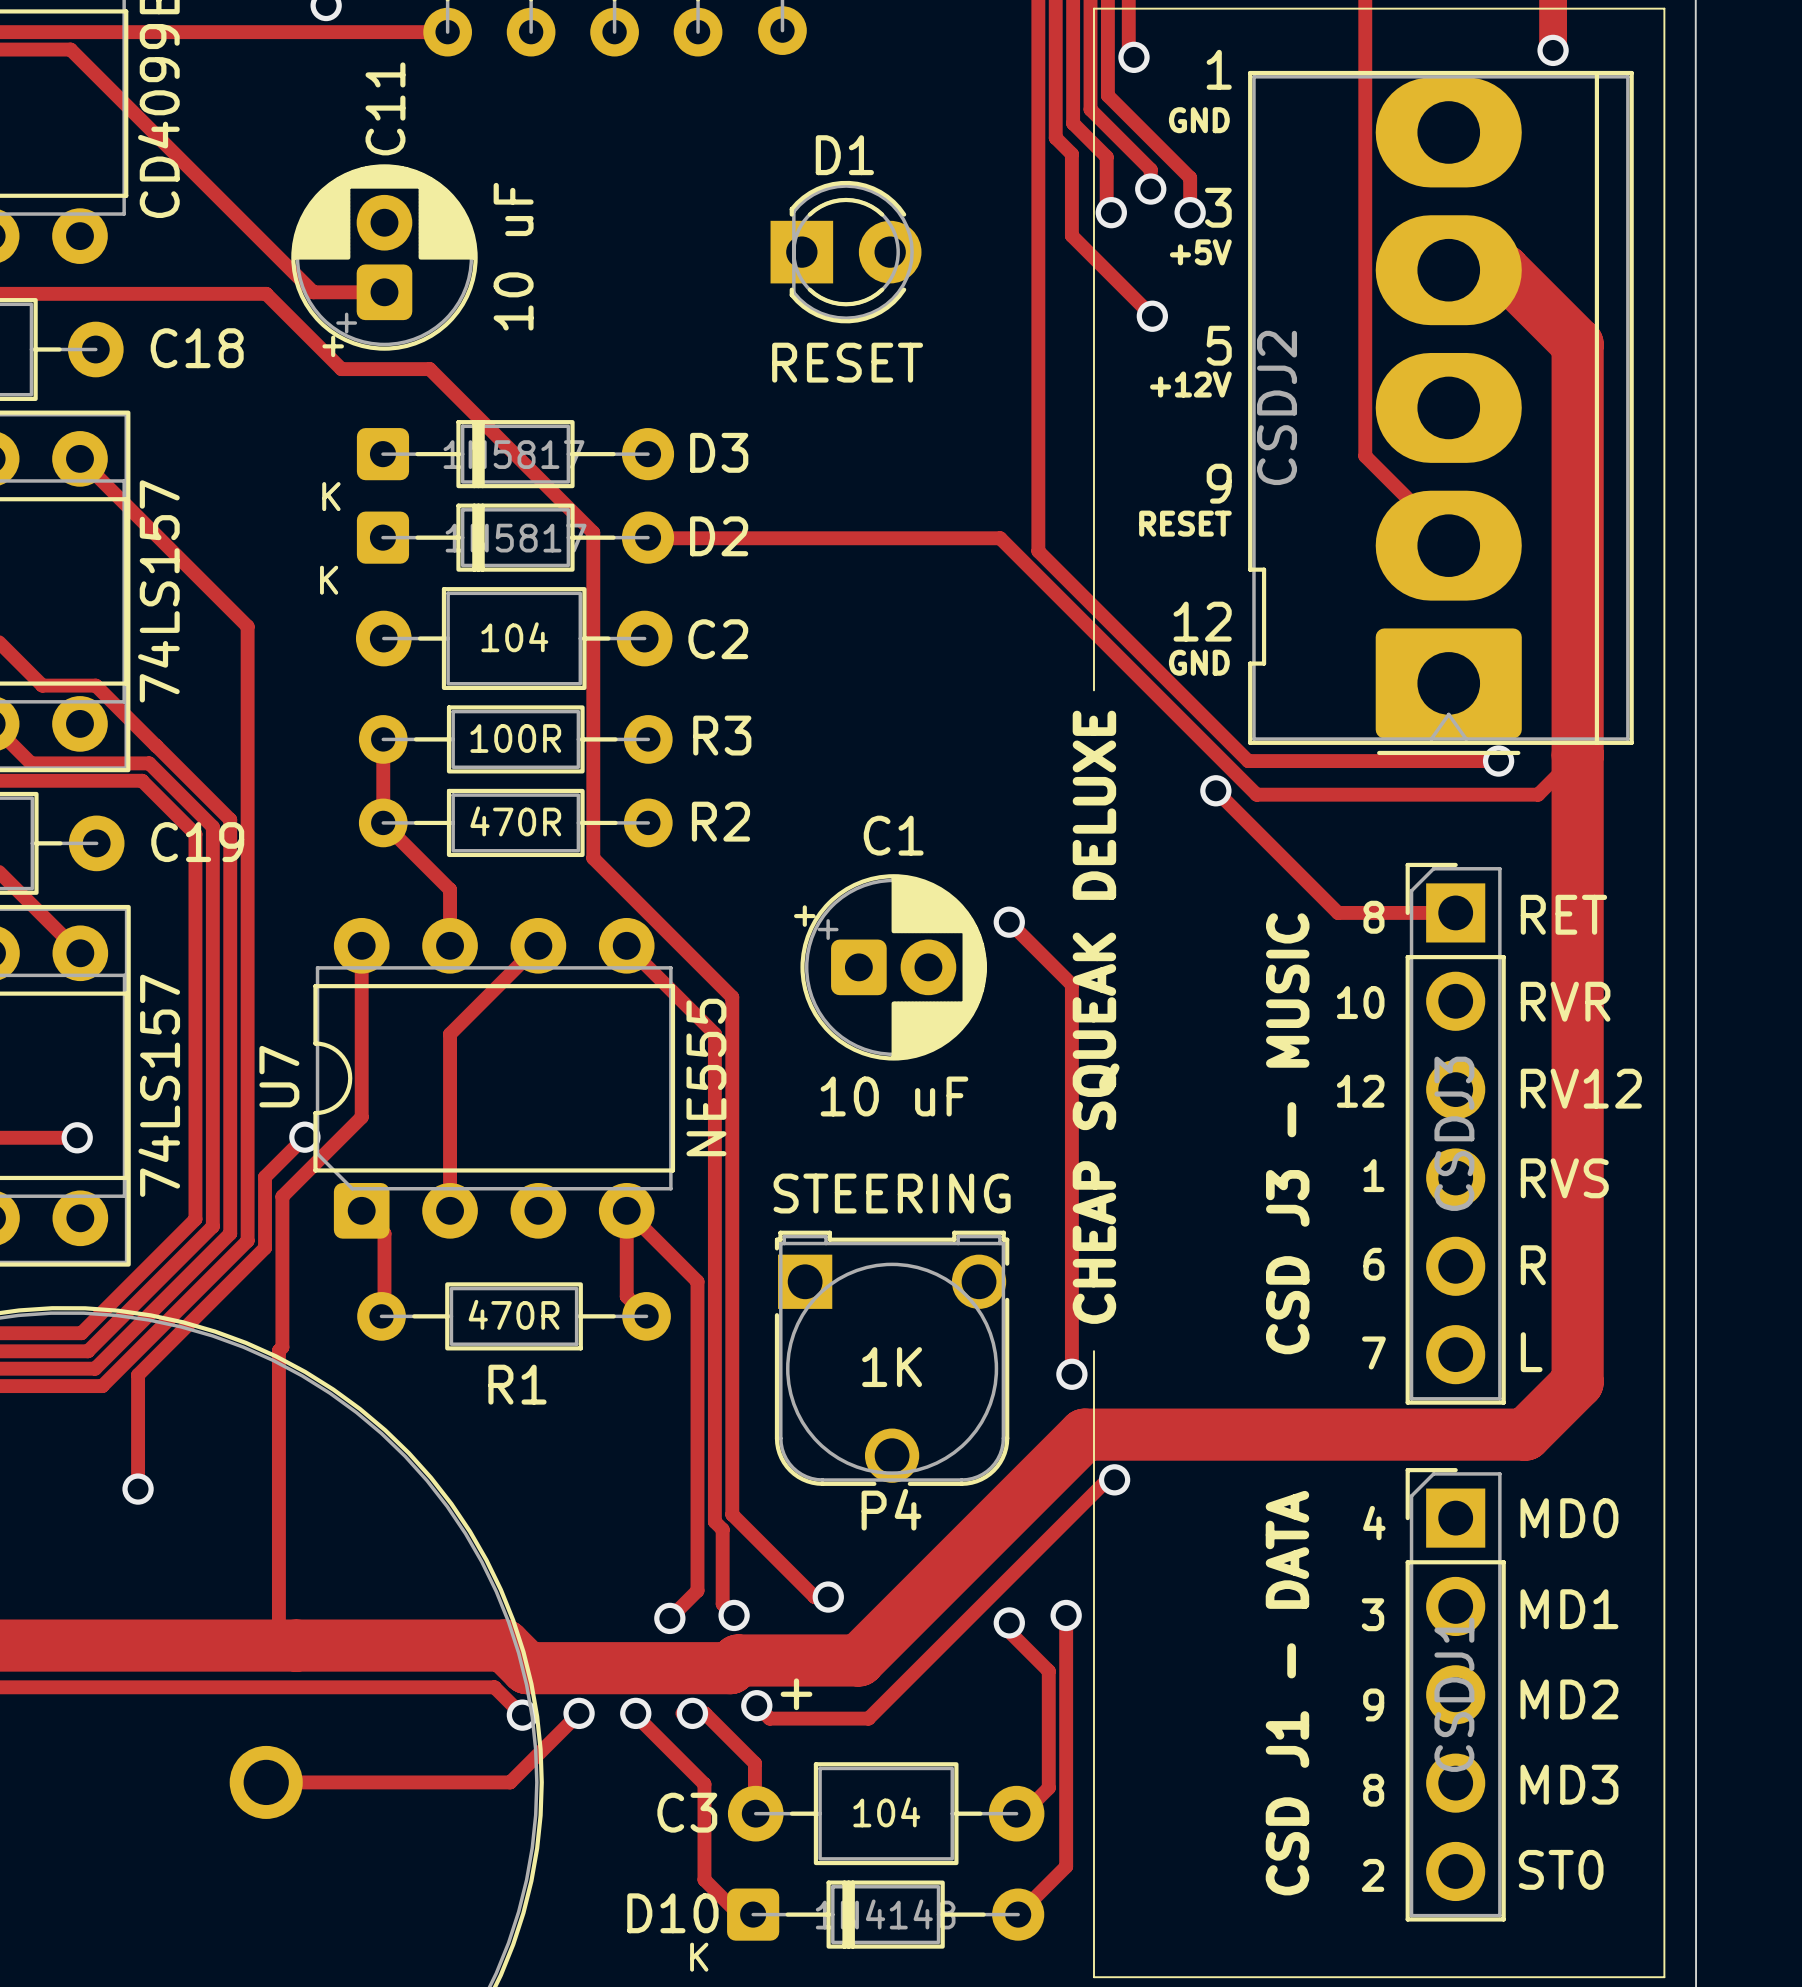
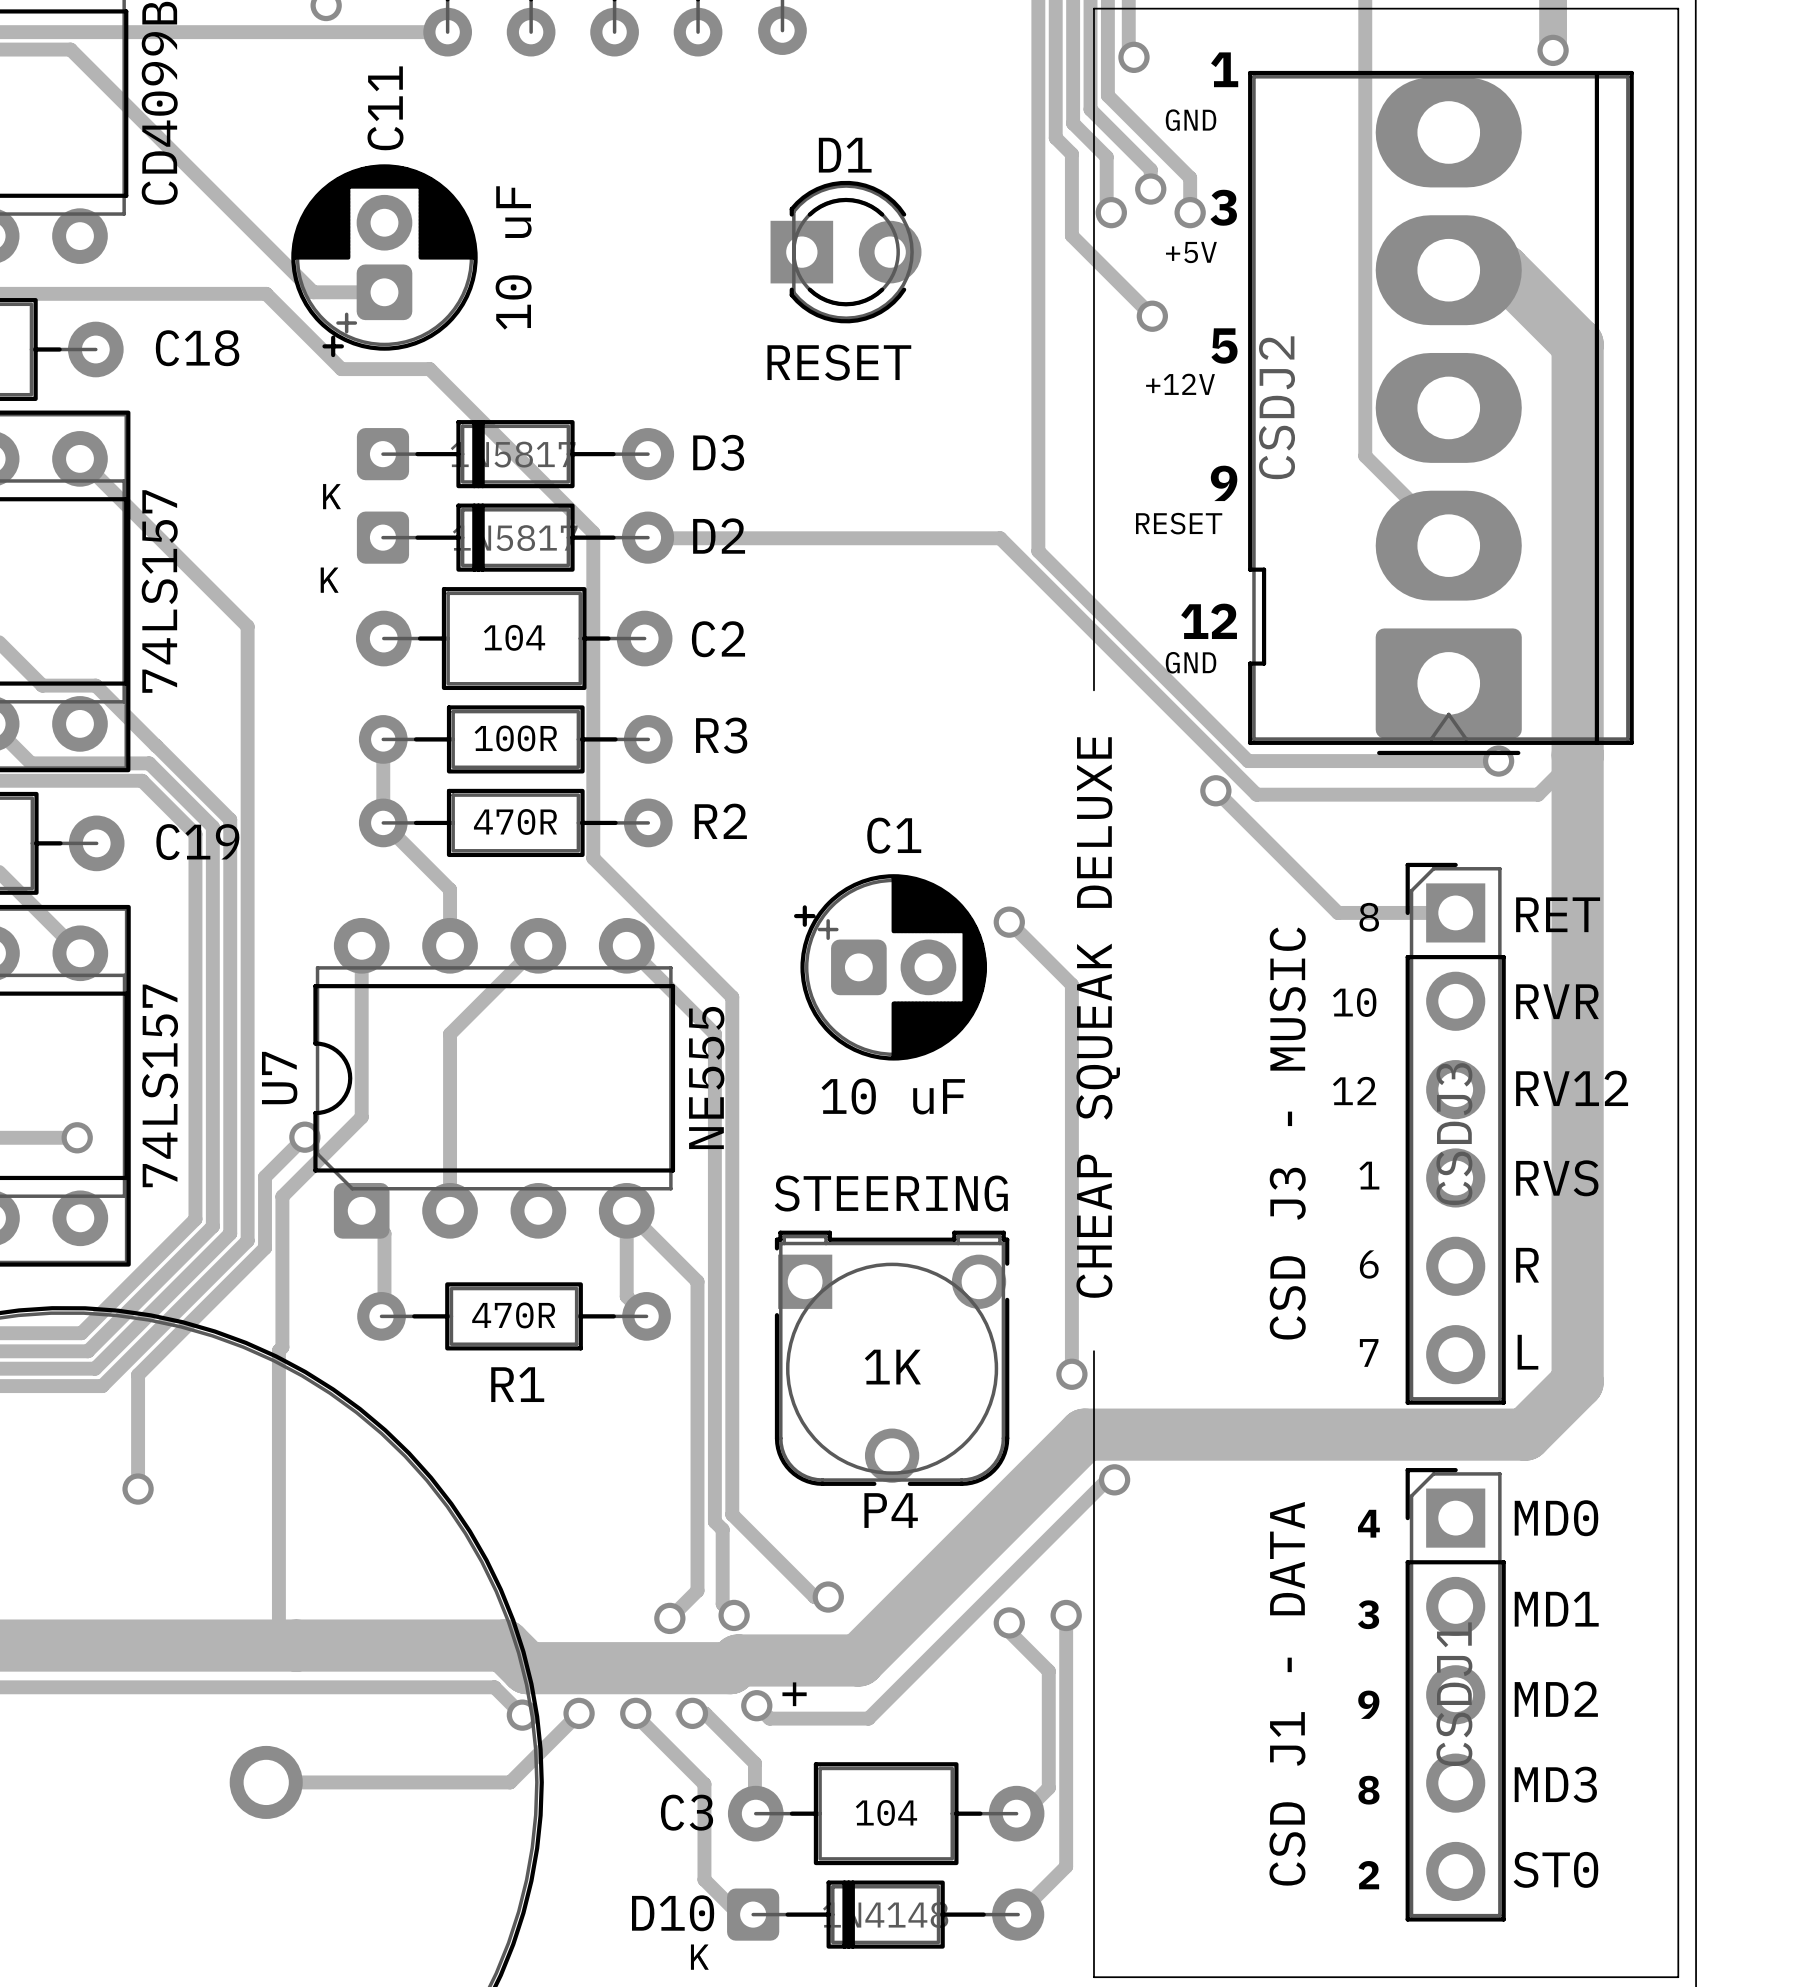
line: (1664, 8) (1664, 1977) -> (1664, 8) (1678, 8) (1678, 1977) (1664, 1977)

